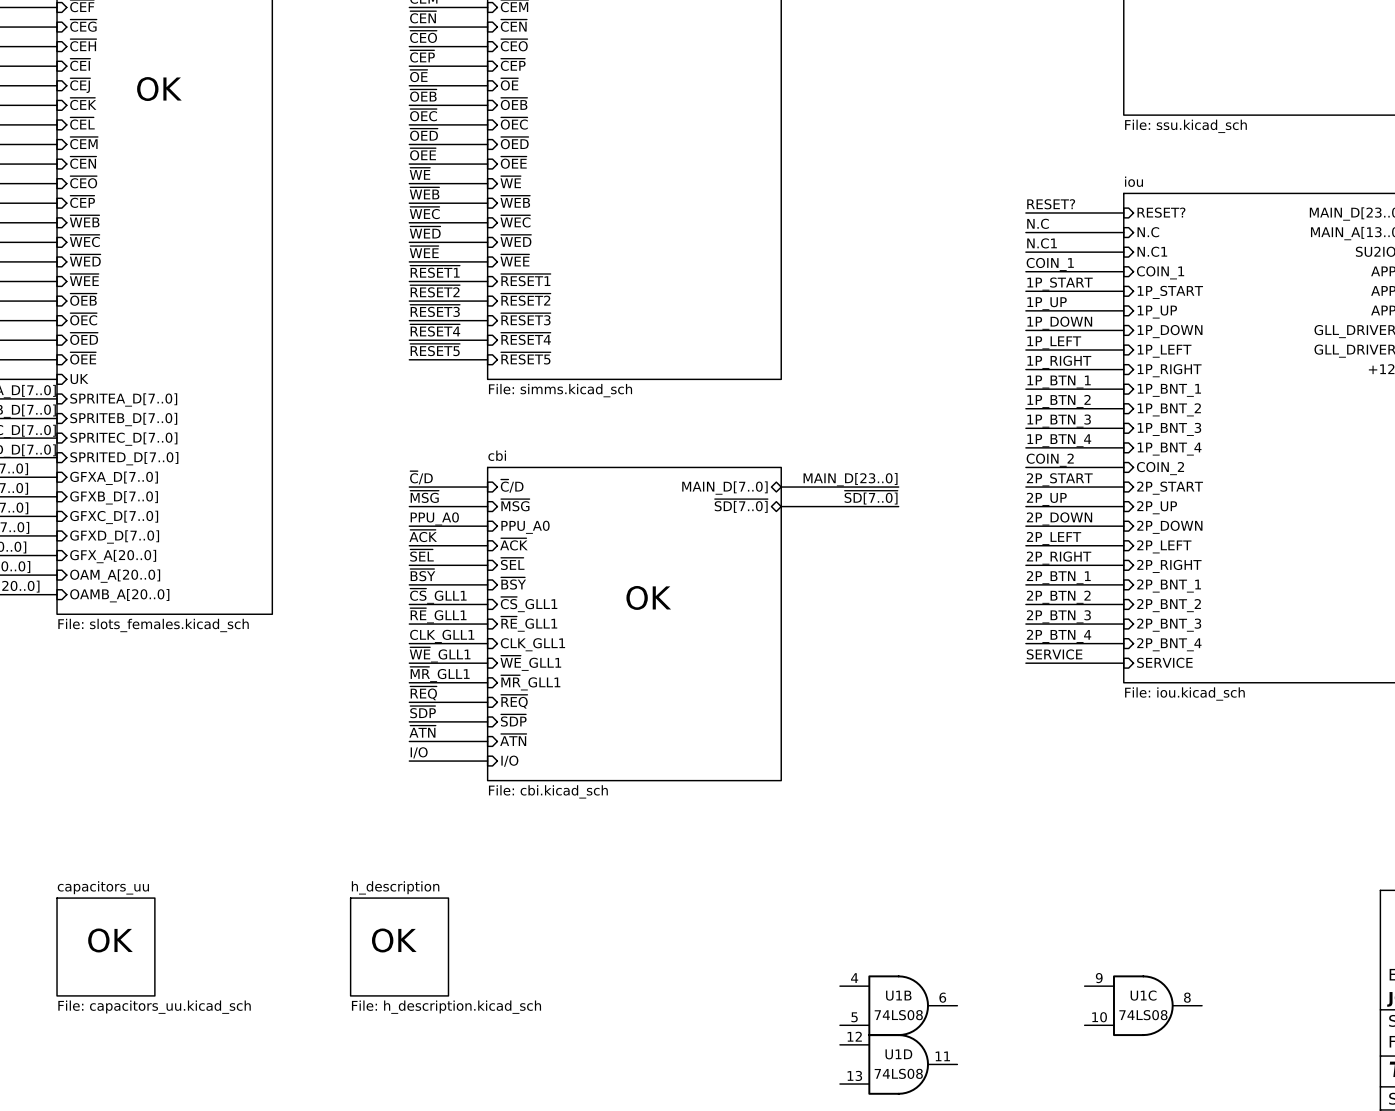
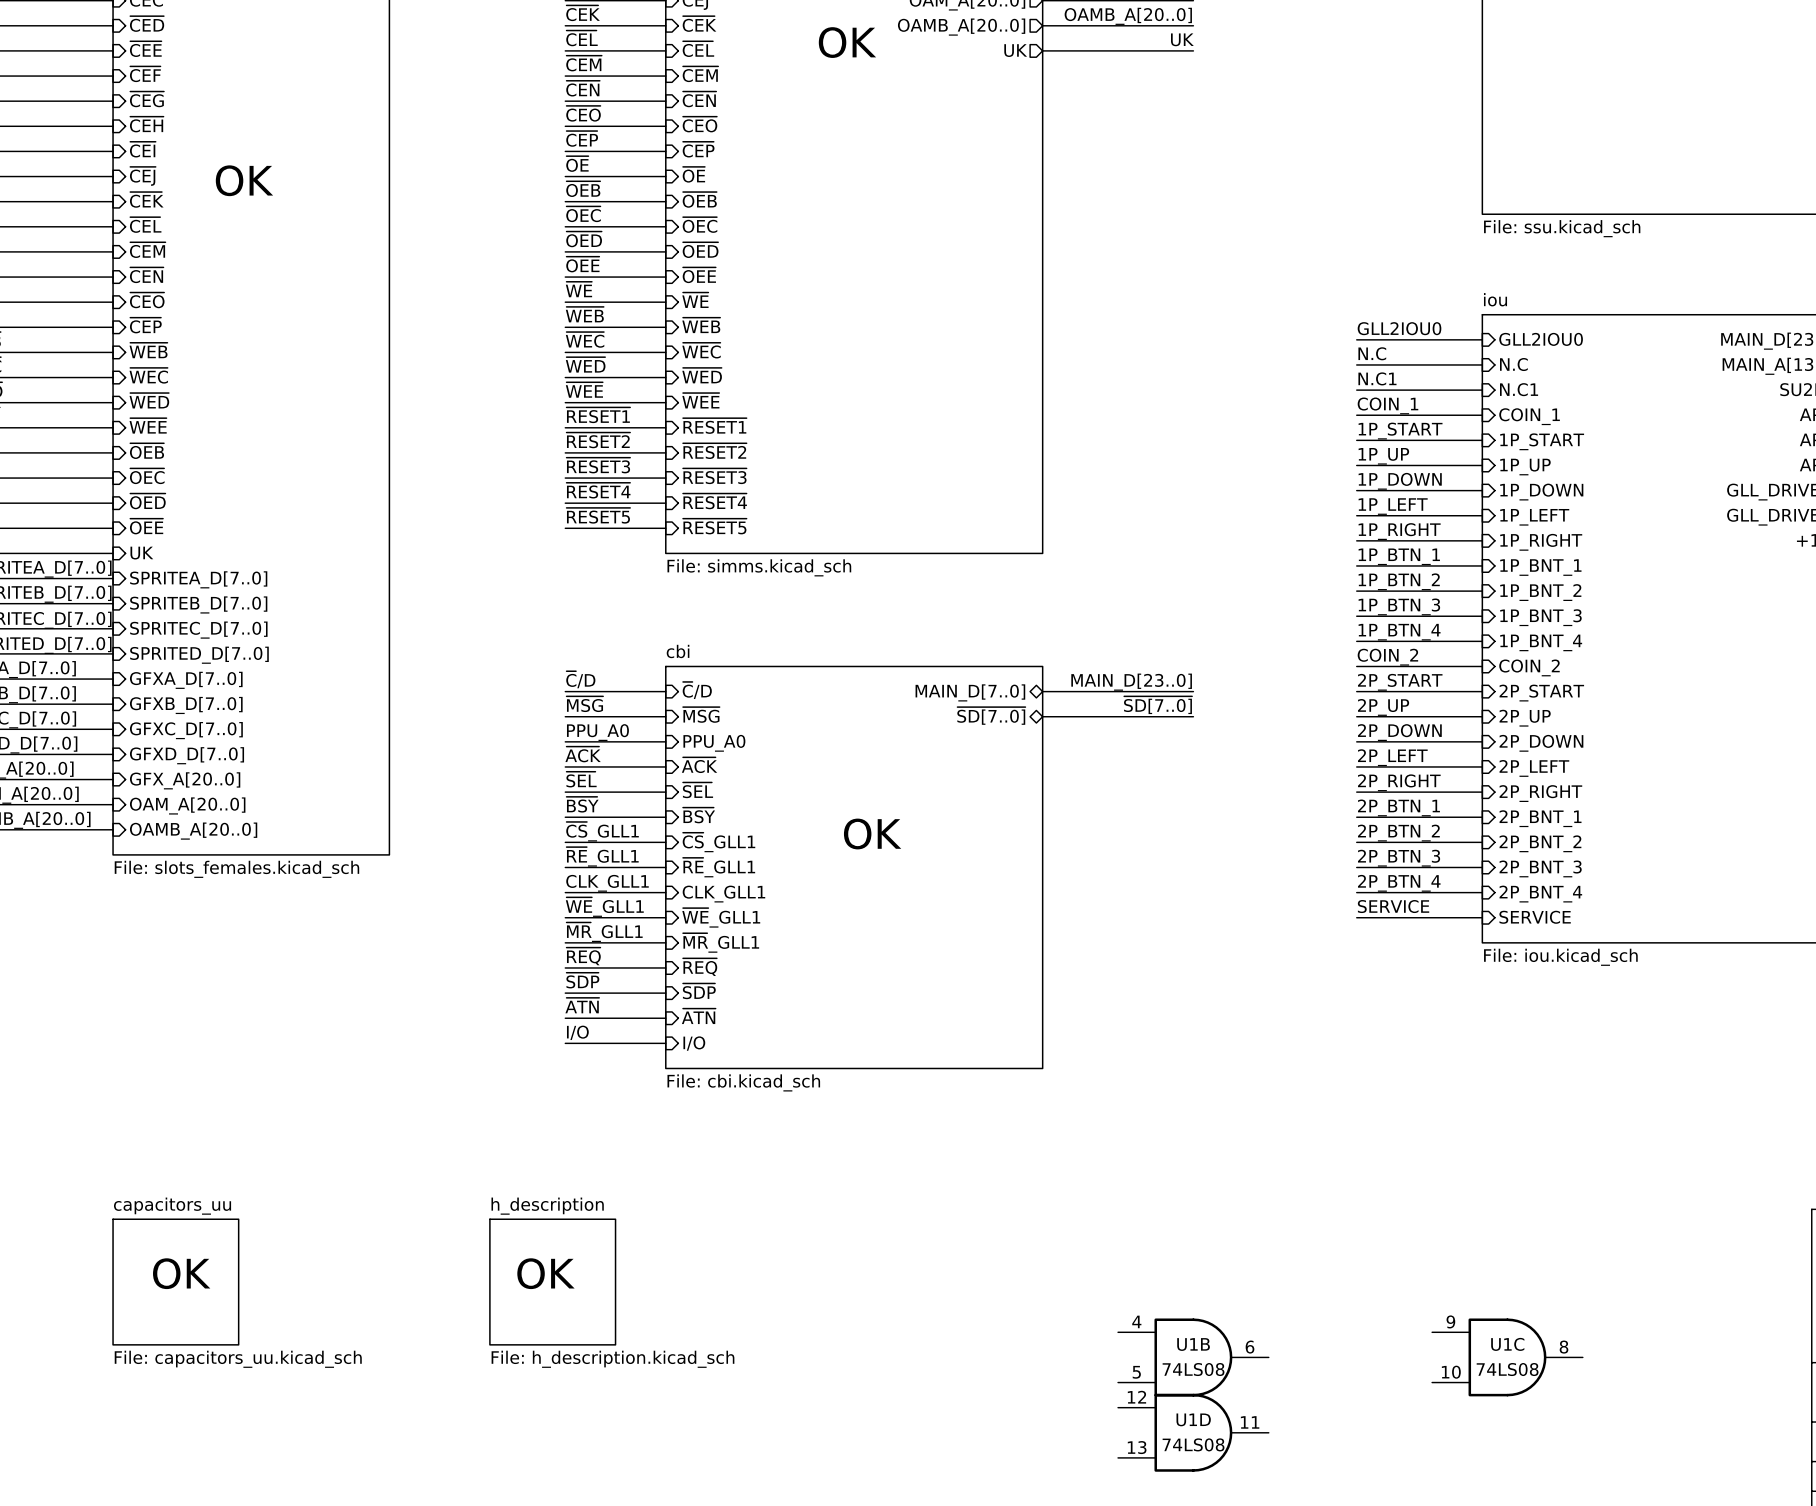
label: RESET? (1051, 204) -> GLL2IOU0 (1399, 328)
sheet pin: RESET? (1161, 212) -> GLL2IOU0 (1541, 339)

